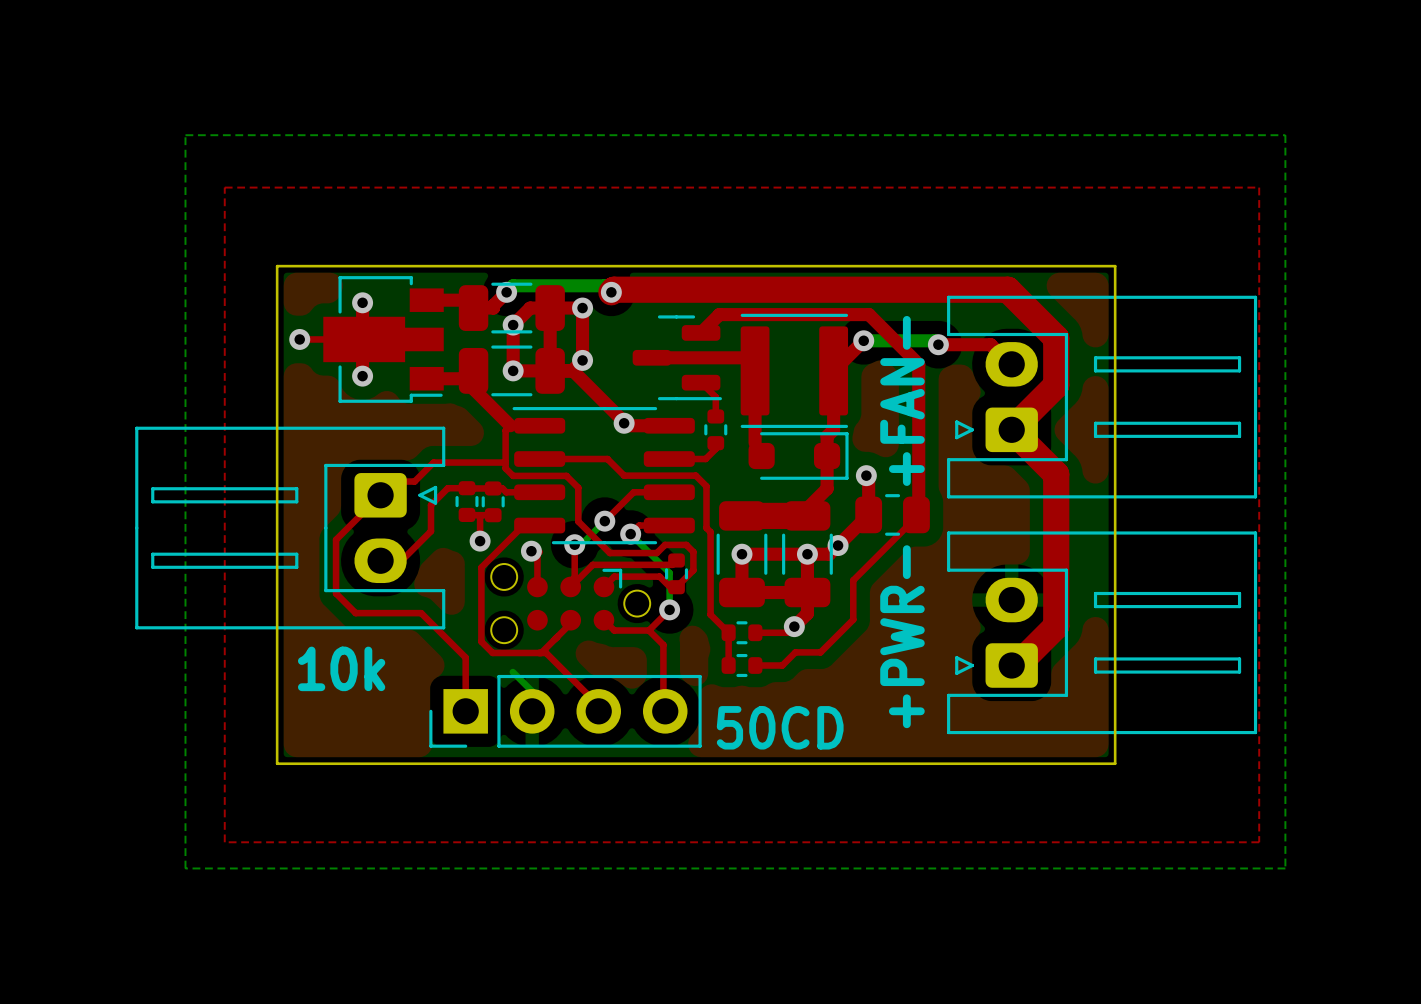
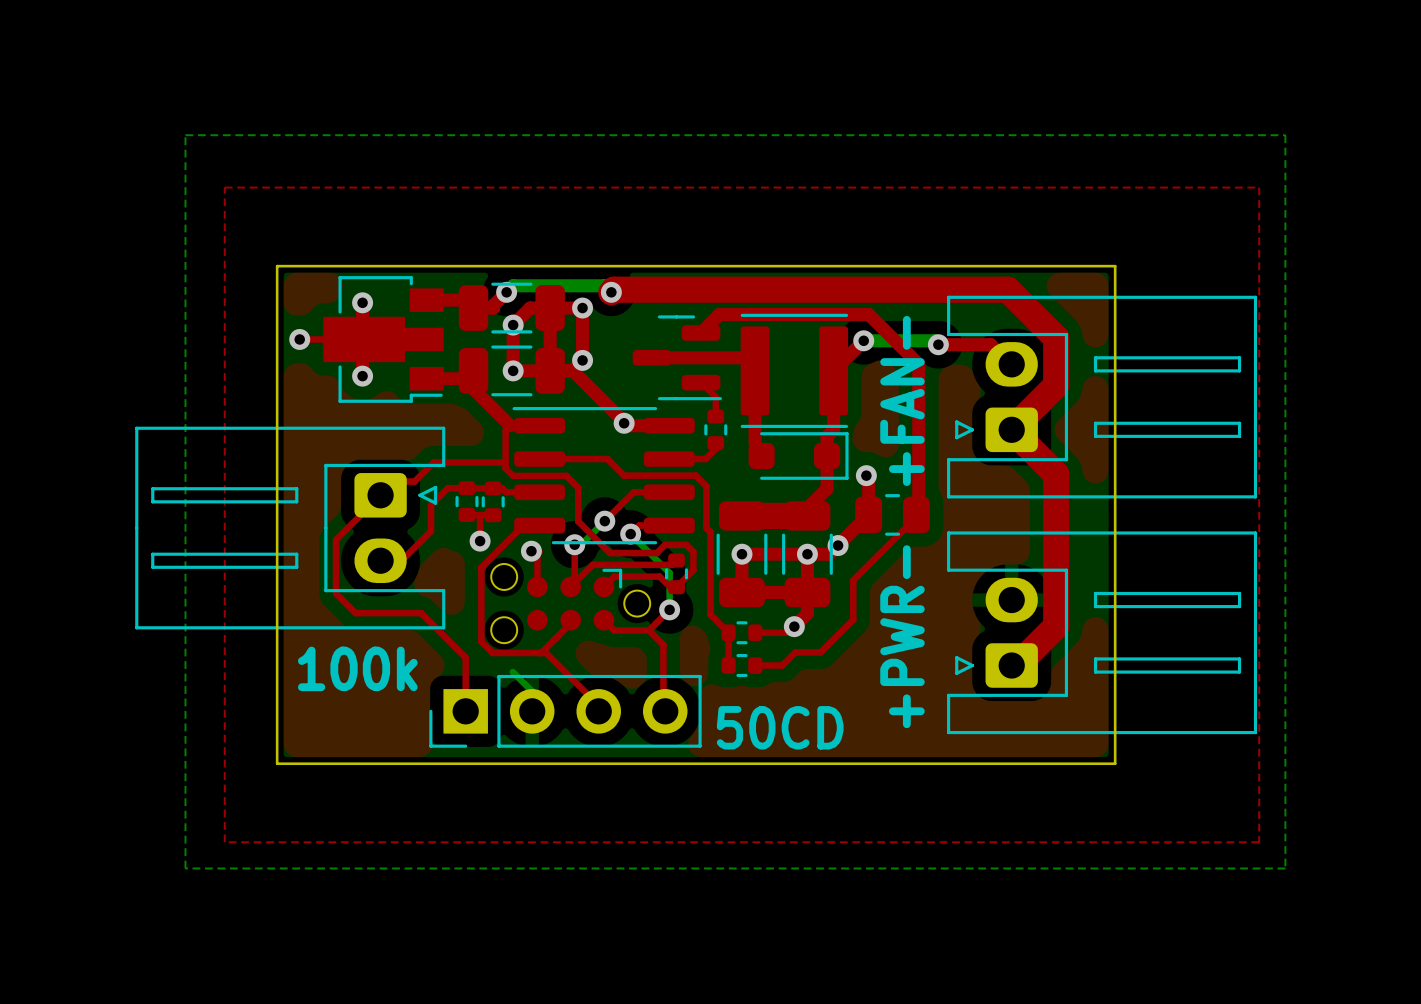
text: 10k (341, 668) -> 100k (357, 668)

